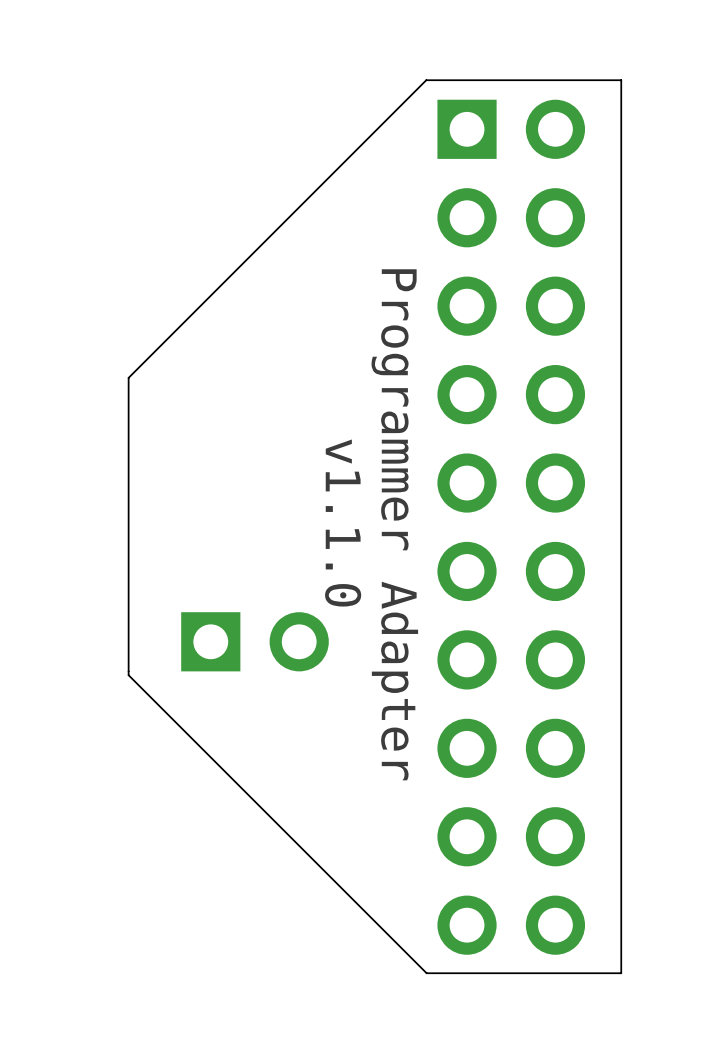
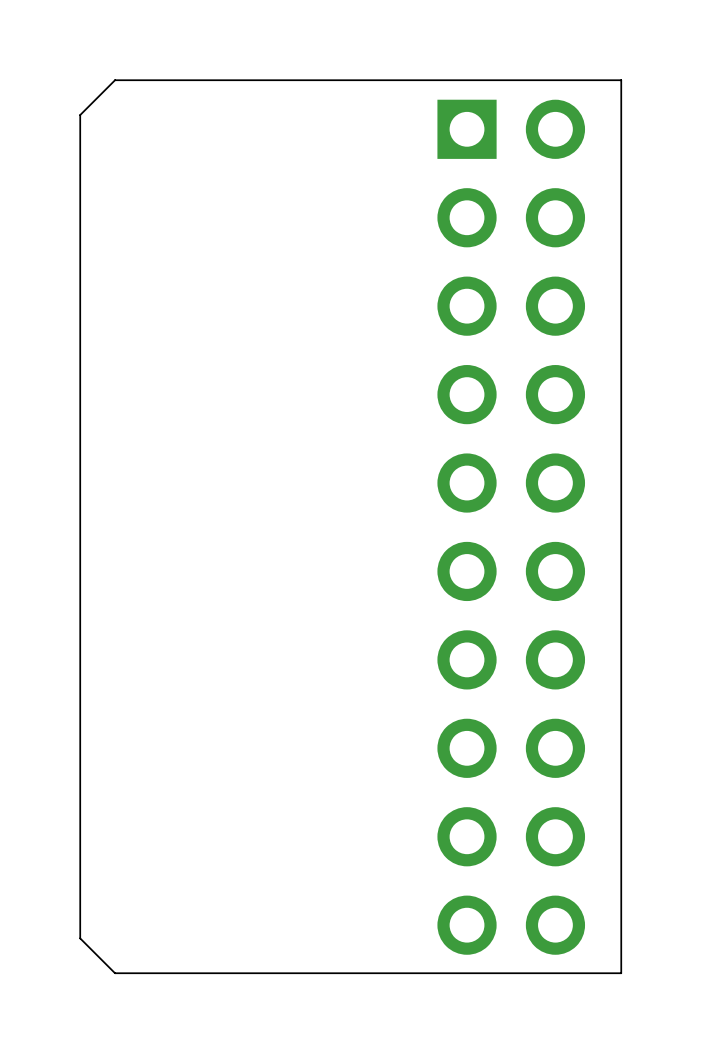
board edge: (426, 80) (128, 377) (128, 675) (426, 973) -> (426, 80) (115, 80) (80, 115) (80, 938) (115, 973) (426, 973)
text: v1.1.0 (343, 523) -> none
text: Programmer Adapter (394, 524) -> none
part: (254, 641) -> none

